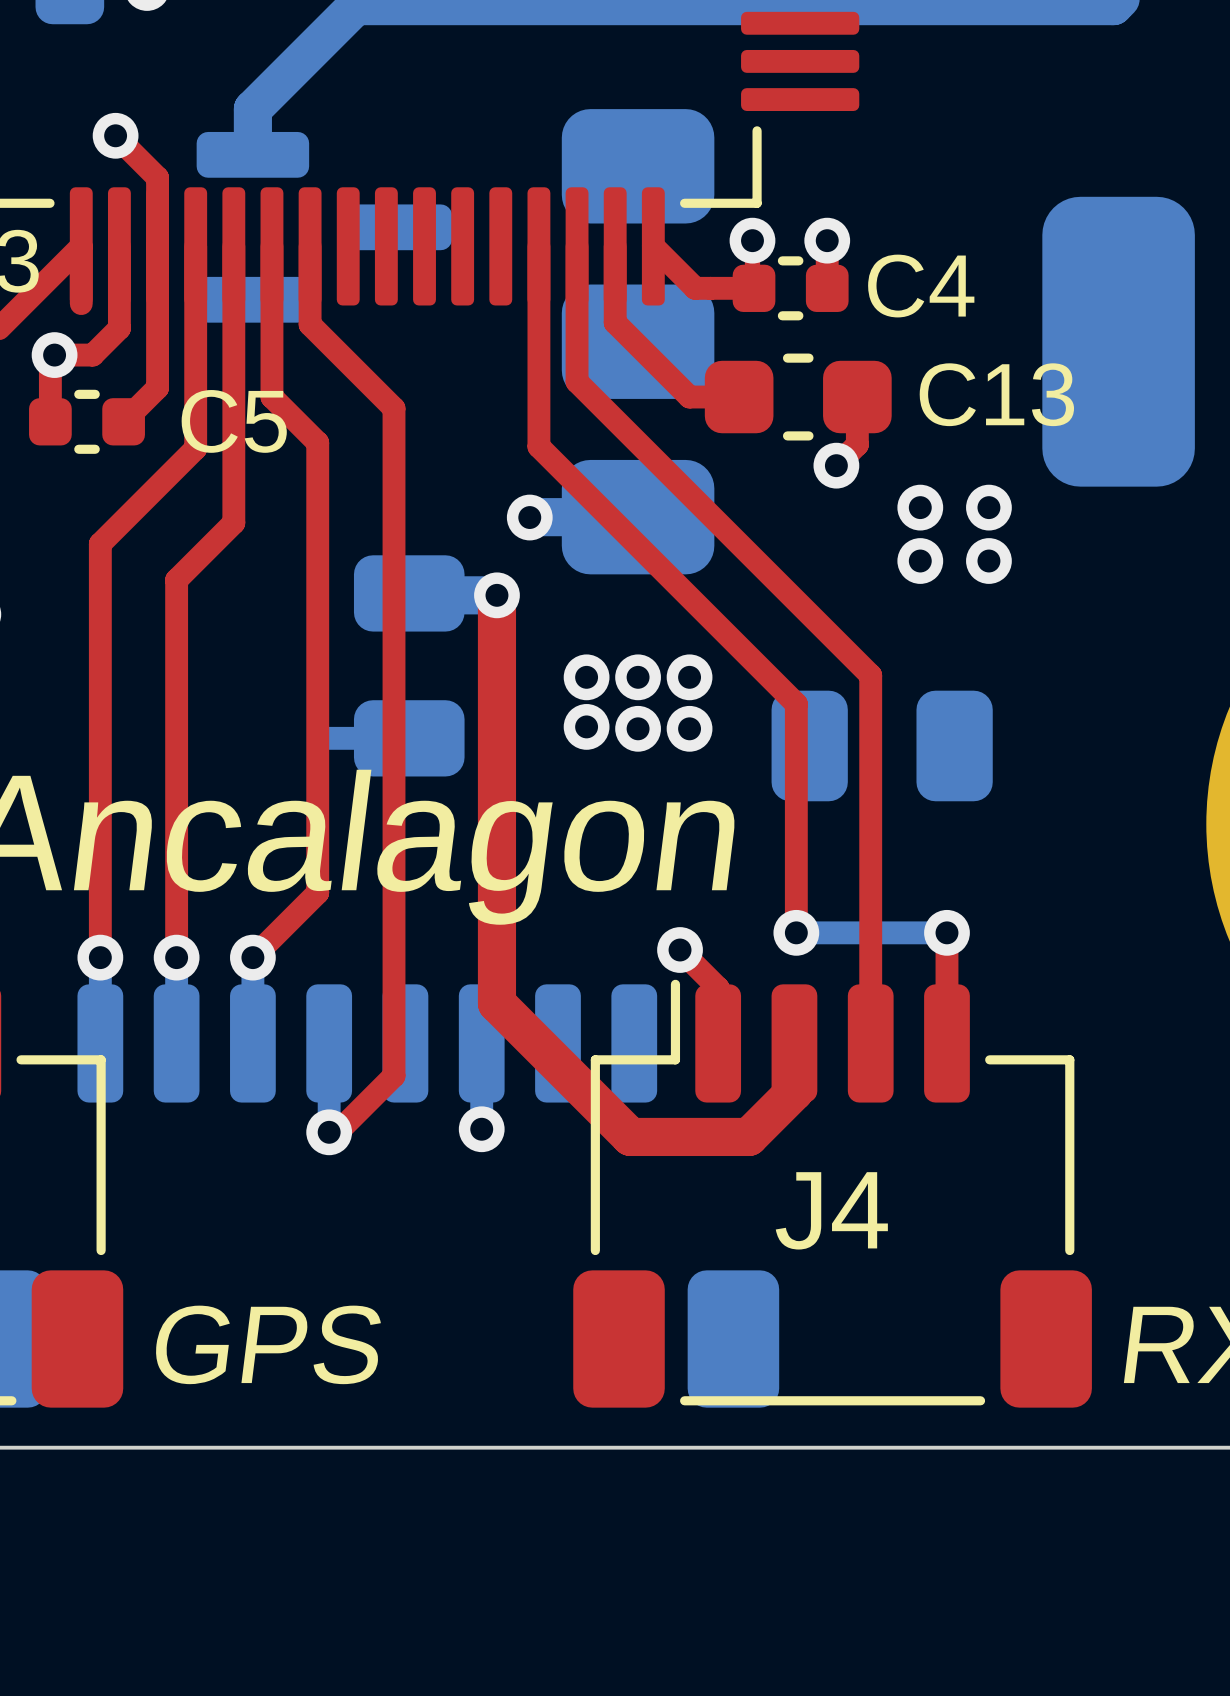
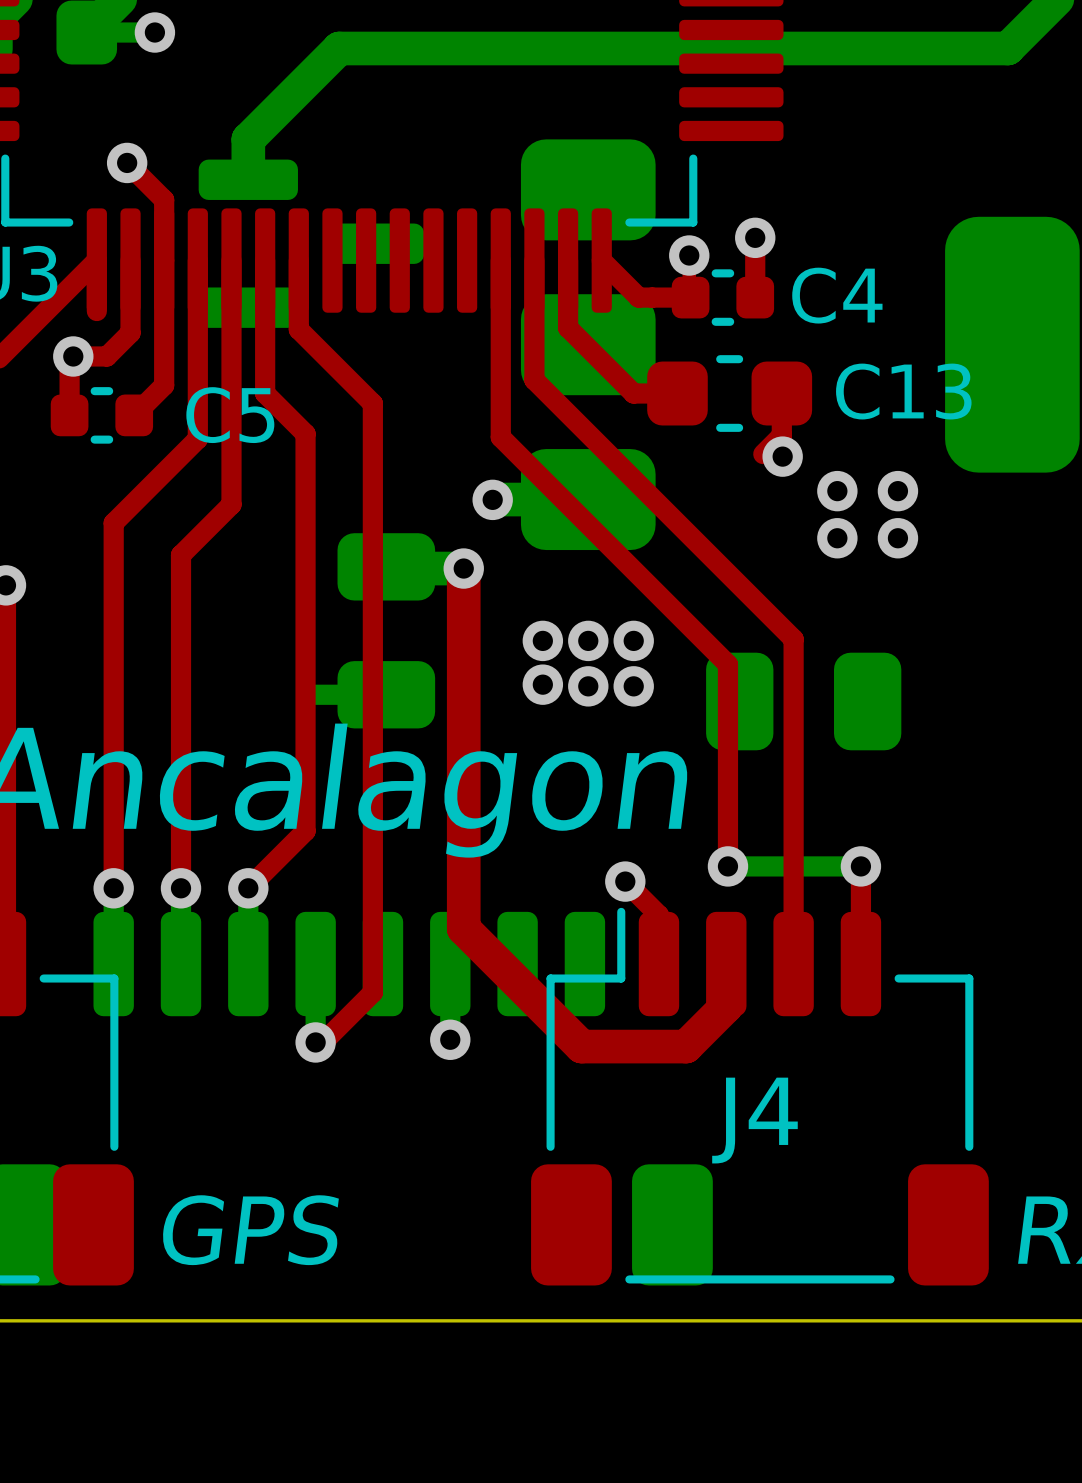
via position: (827, 240) -> (755, 237)
via position: (836, 465) -> (782, 456)

